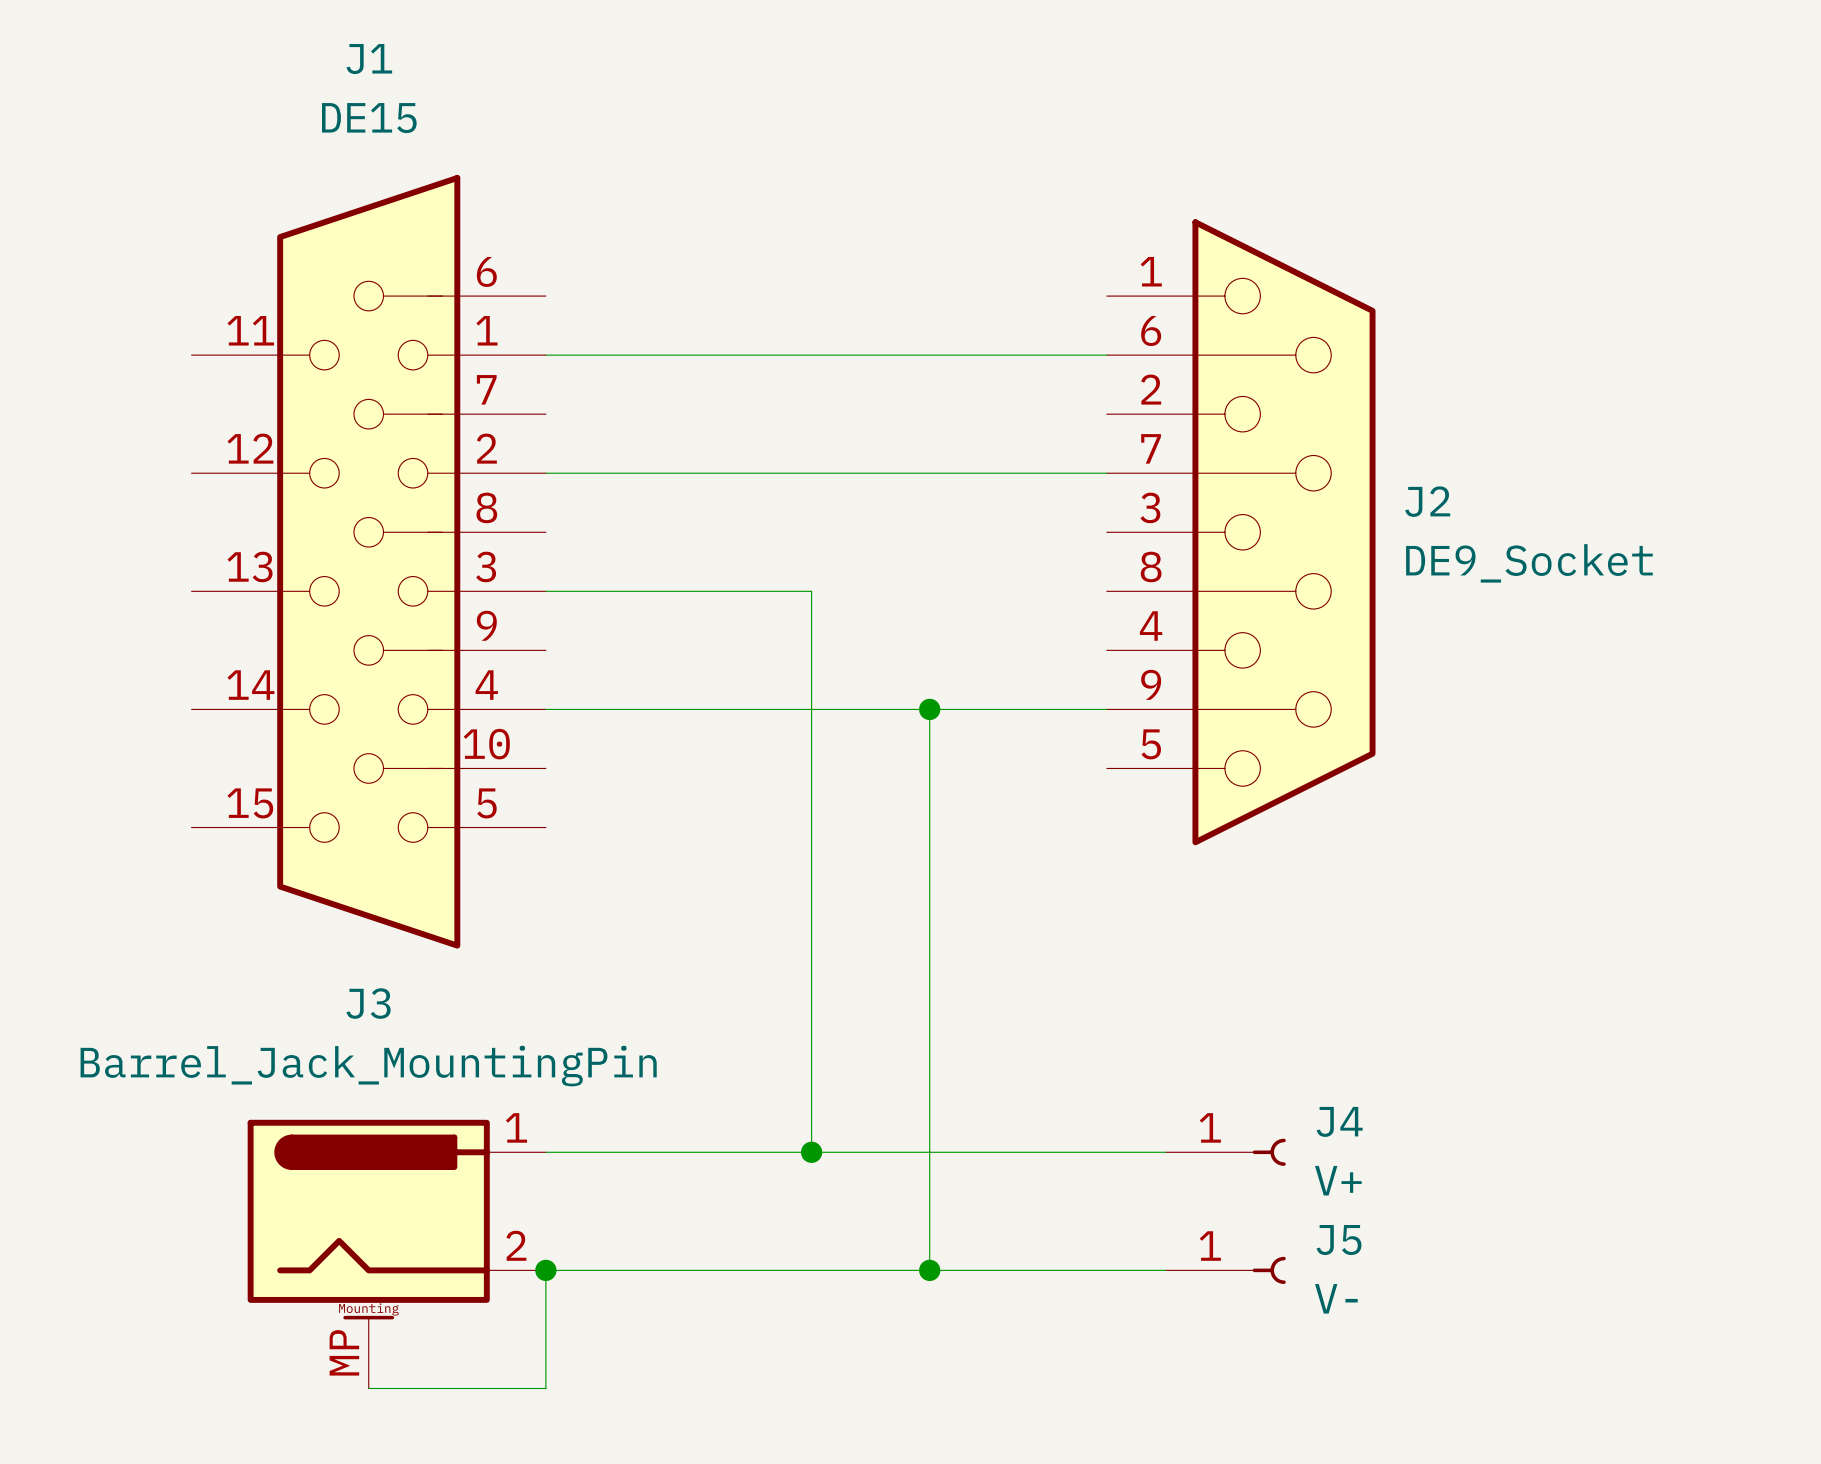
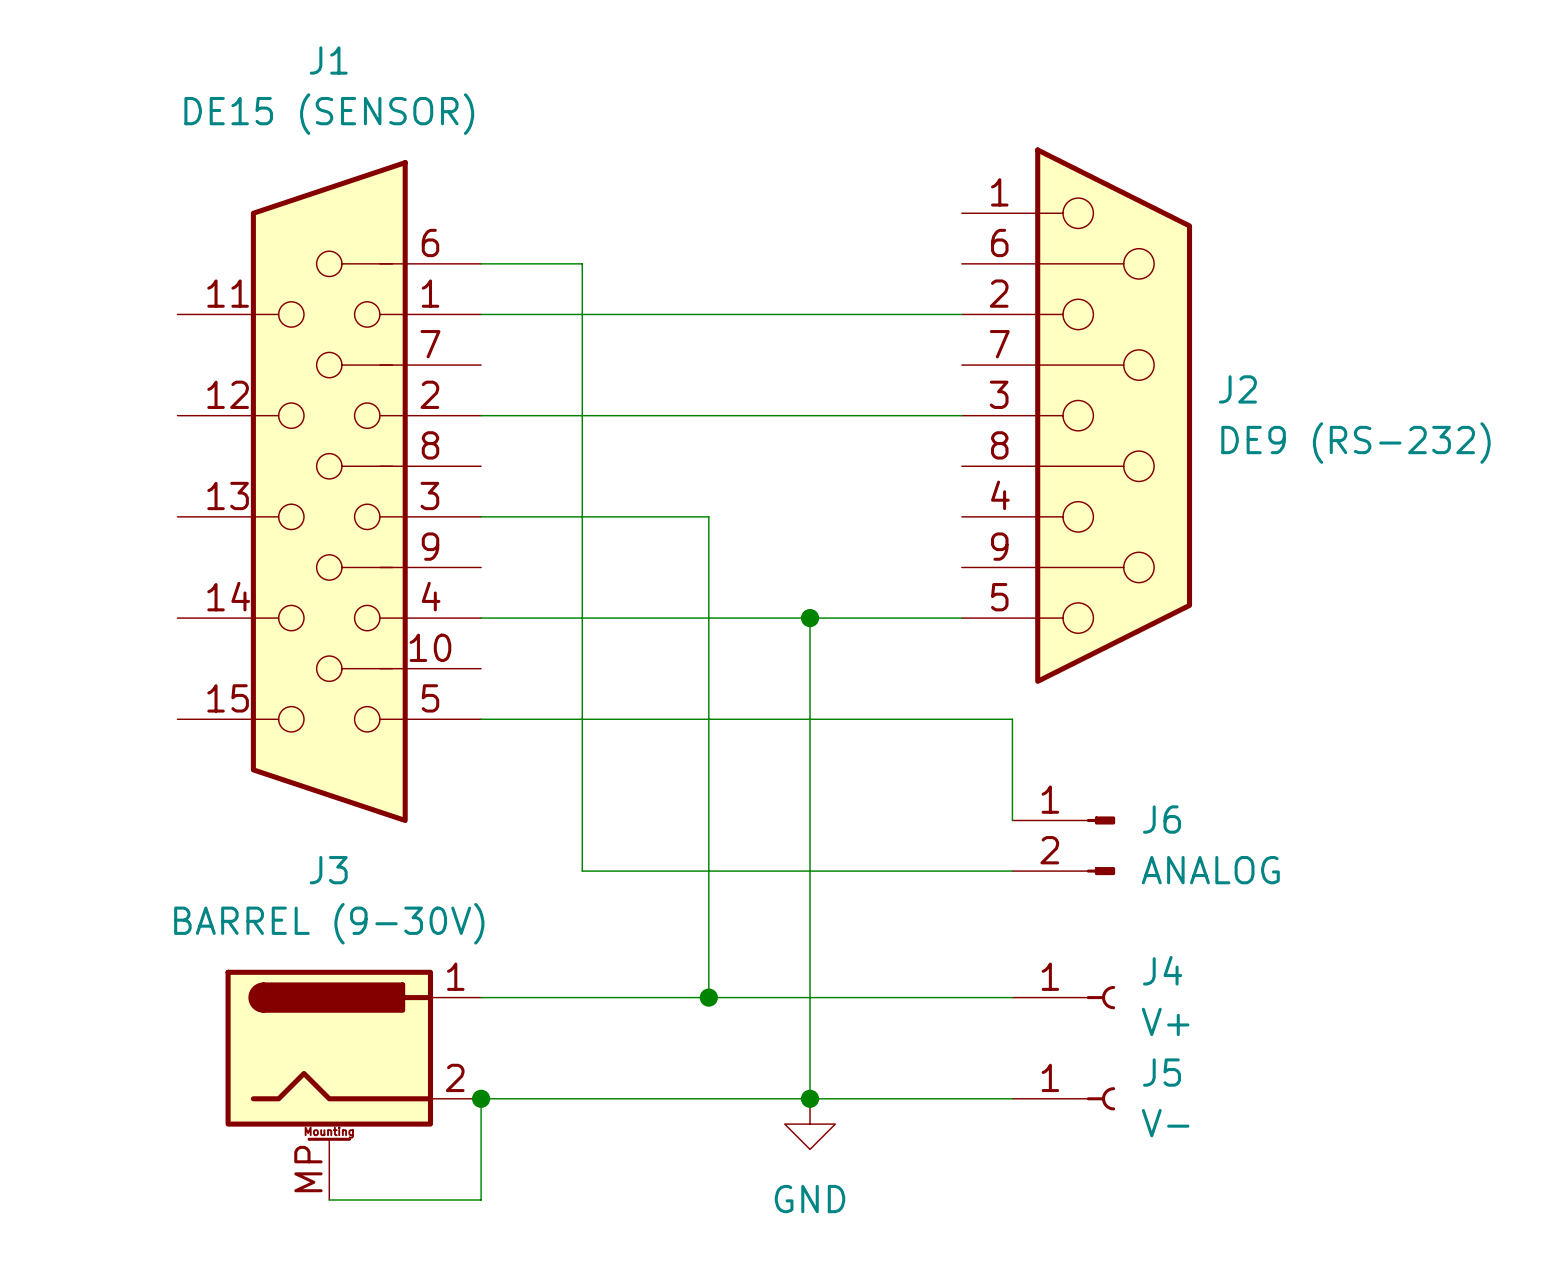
J1 value: DE15 (369, 118) -> DE15 (SENSOR) (329, 114)
wire: none -> (481, 263) (582, 263) (582, 871) (1012, 871)
J2 position: (1241, 532) -> (1076, 415)
J2 value: DE9_Socket (1529, 563) -> DE9 (RS-232) (1355, 443)
wire: none -> (481, 719) (1012, 719) (1012, 820)
J6: none -> ANALOG (1063, 845)
J3 value: Barrel_Jack_MountingPin (368, 1066) -> BARREL (9-30V) (329, 923)
power symbol: none -> GND (810, 1124)

